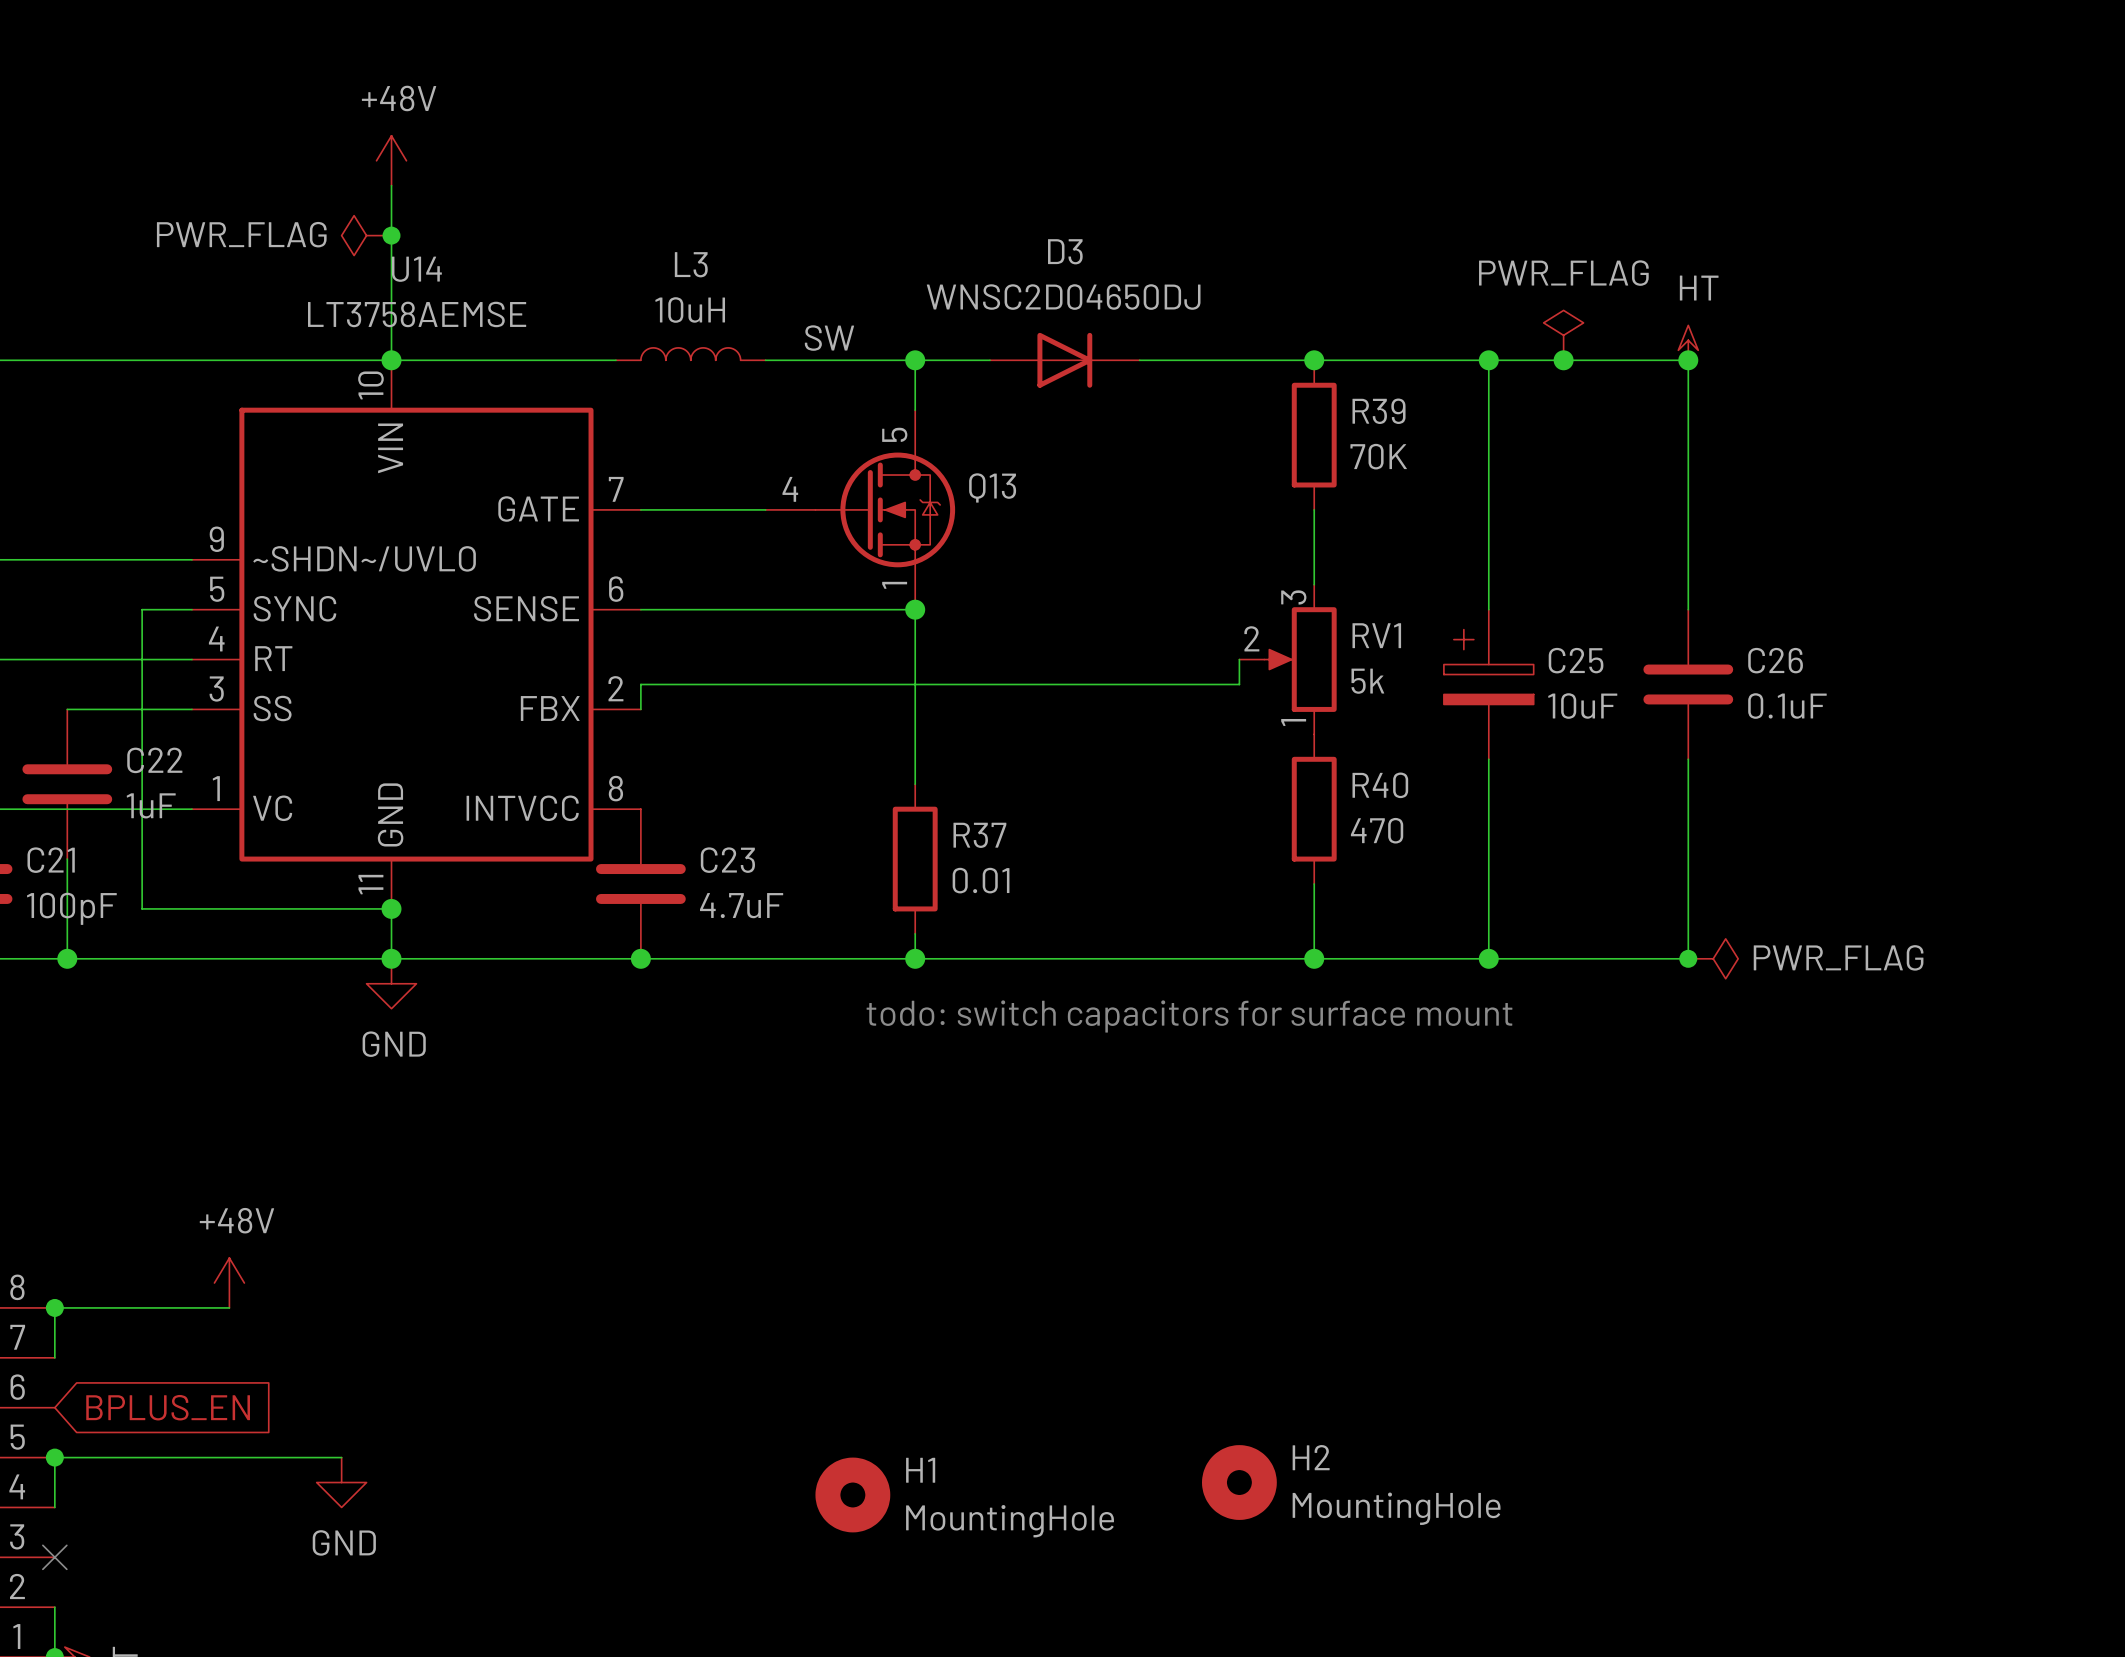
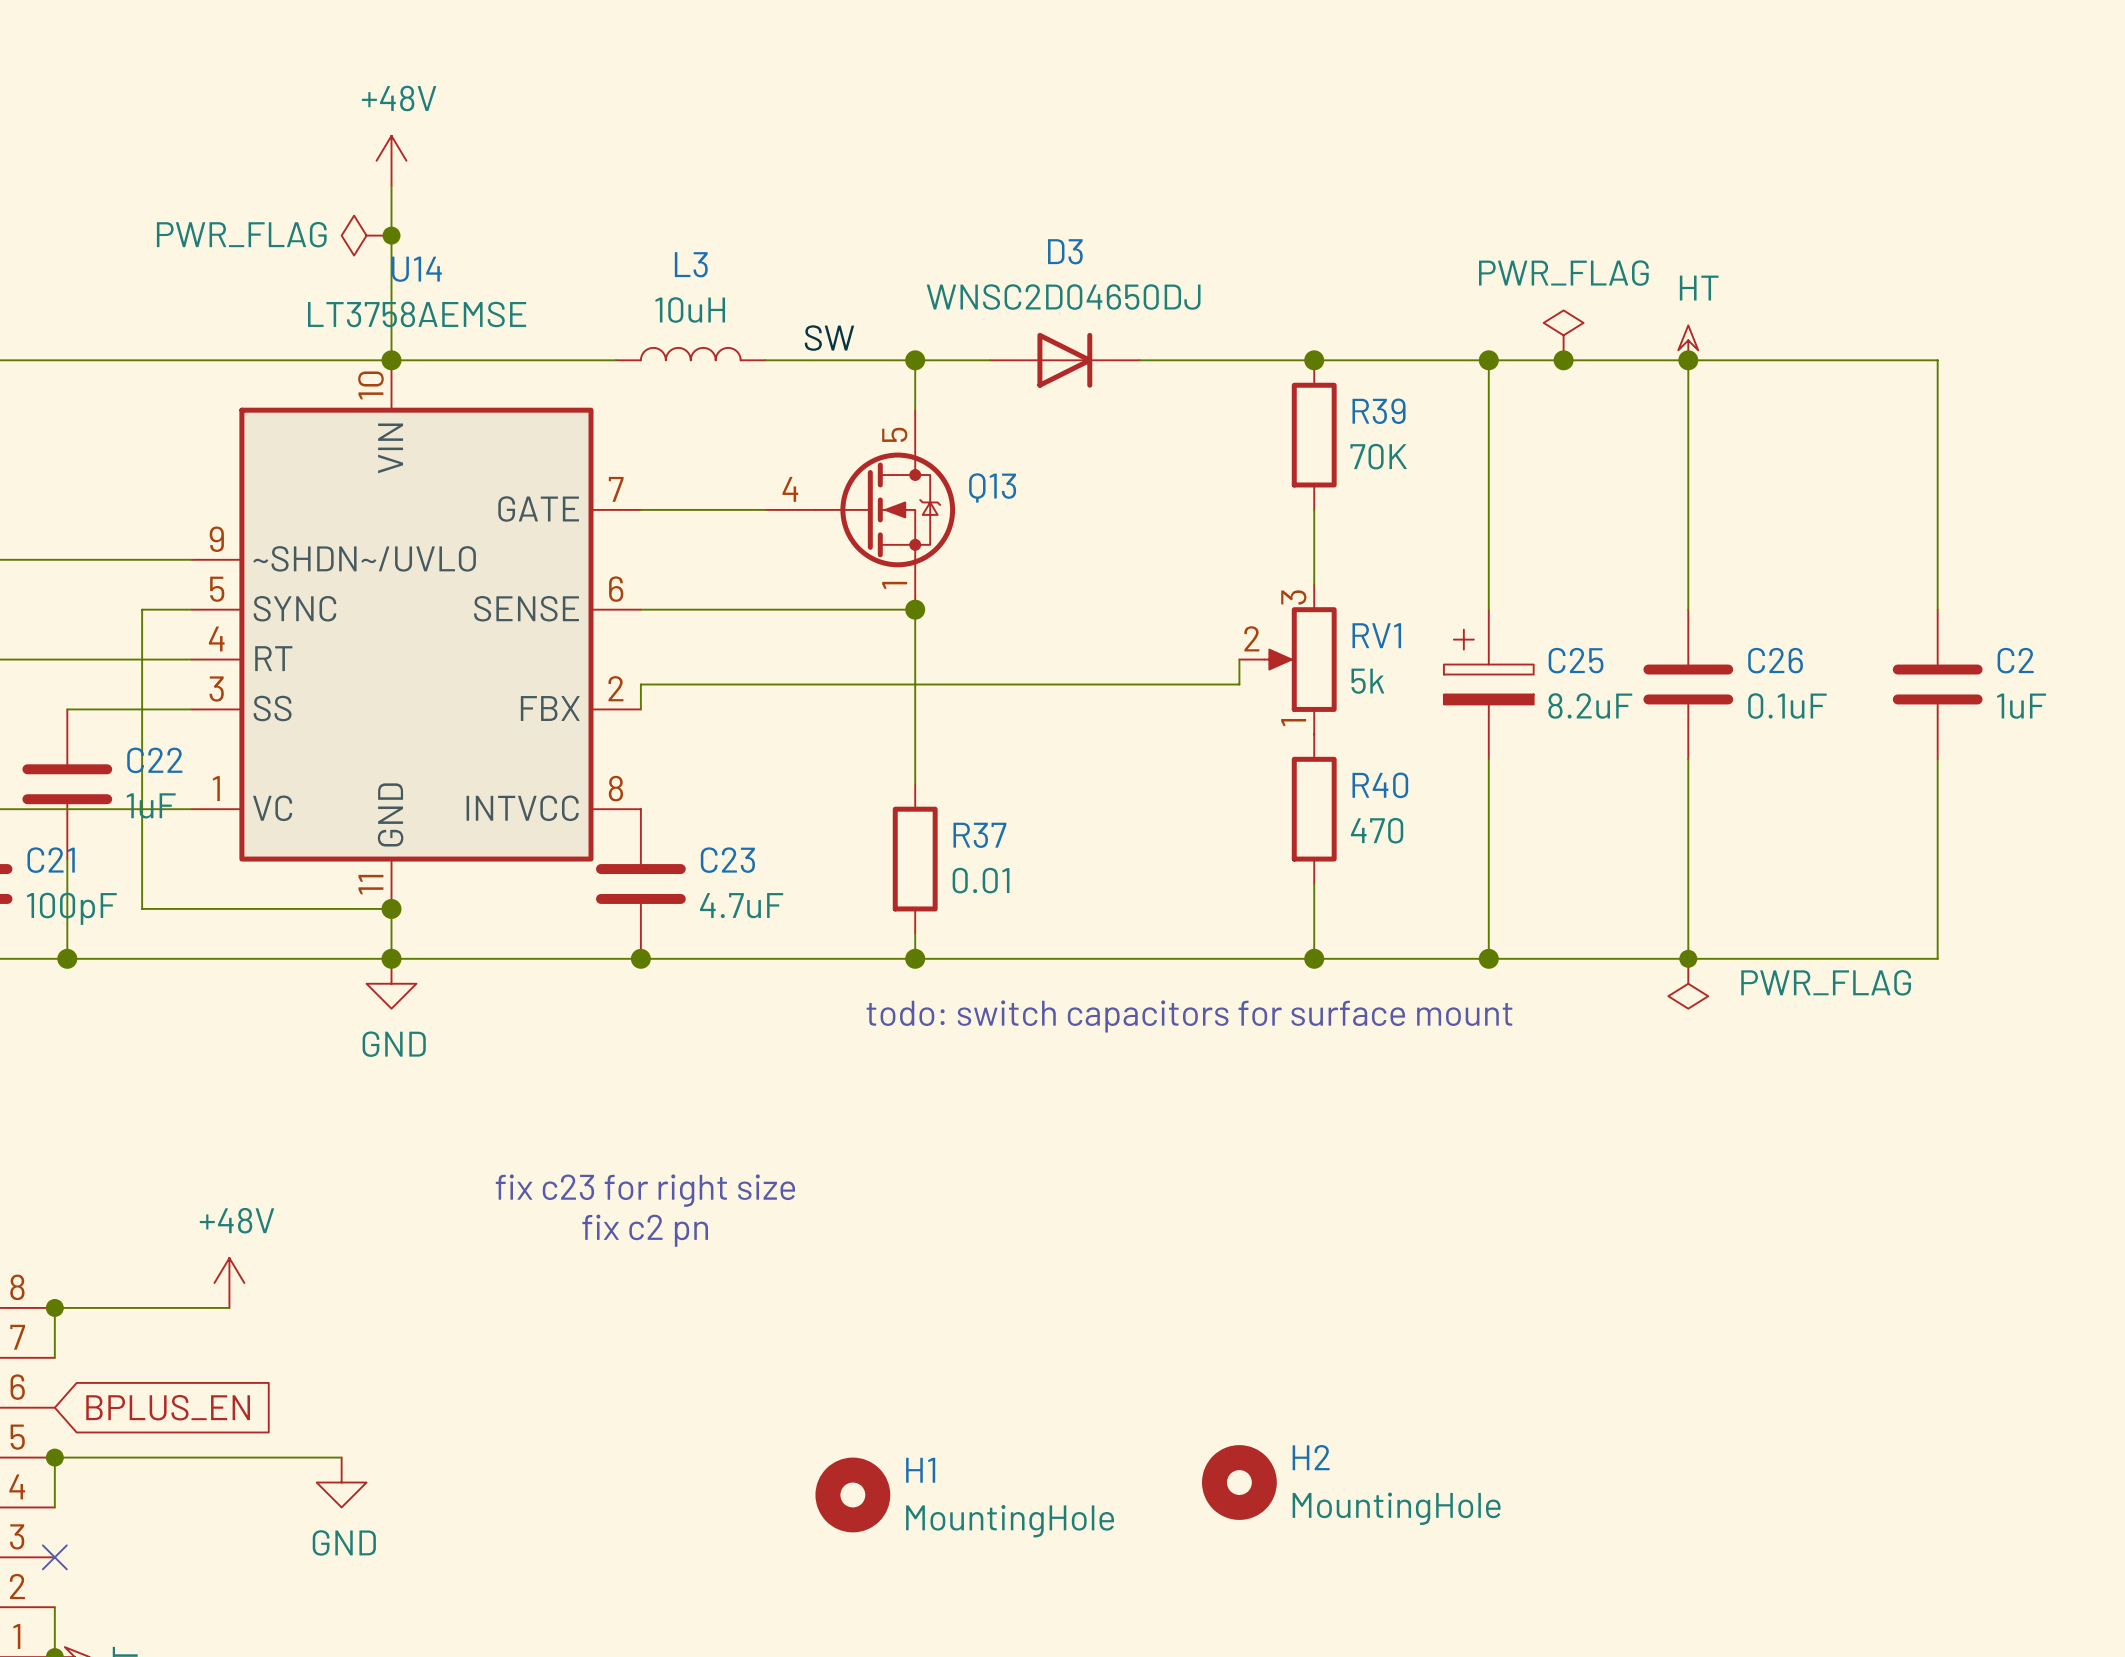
wire: none -> (1688, 360) (1937, 360) (1937, 609)
C2: none -> 1uF (1937, 684)
C25 value: 10uF (1582, 706) -> 8.2uF (1590, 705)
wire: none -> (1937, 759) (1937, 958) (1688, 958)
power symbol rotation: 0° (1713, 958) -> 90° clockwise (1688, 983)
power symbol position: PWR_FLAG (1713, 958) -> PWR_FLAG (1688, 983)
text: none -> fix c23 for right size (645, 1190)
text: none -> fix c2 pn (645, 1230)

